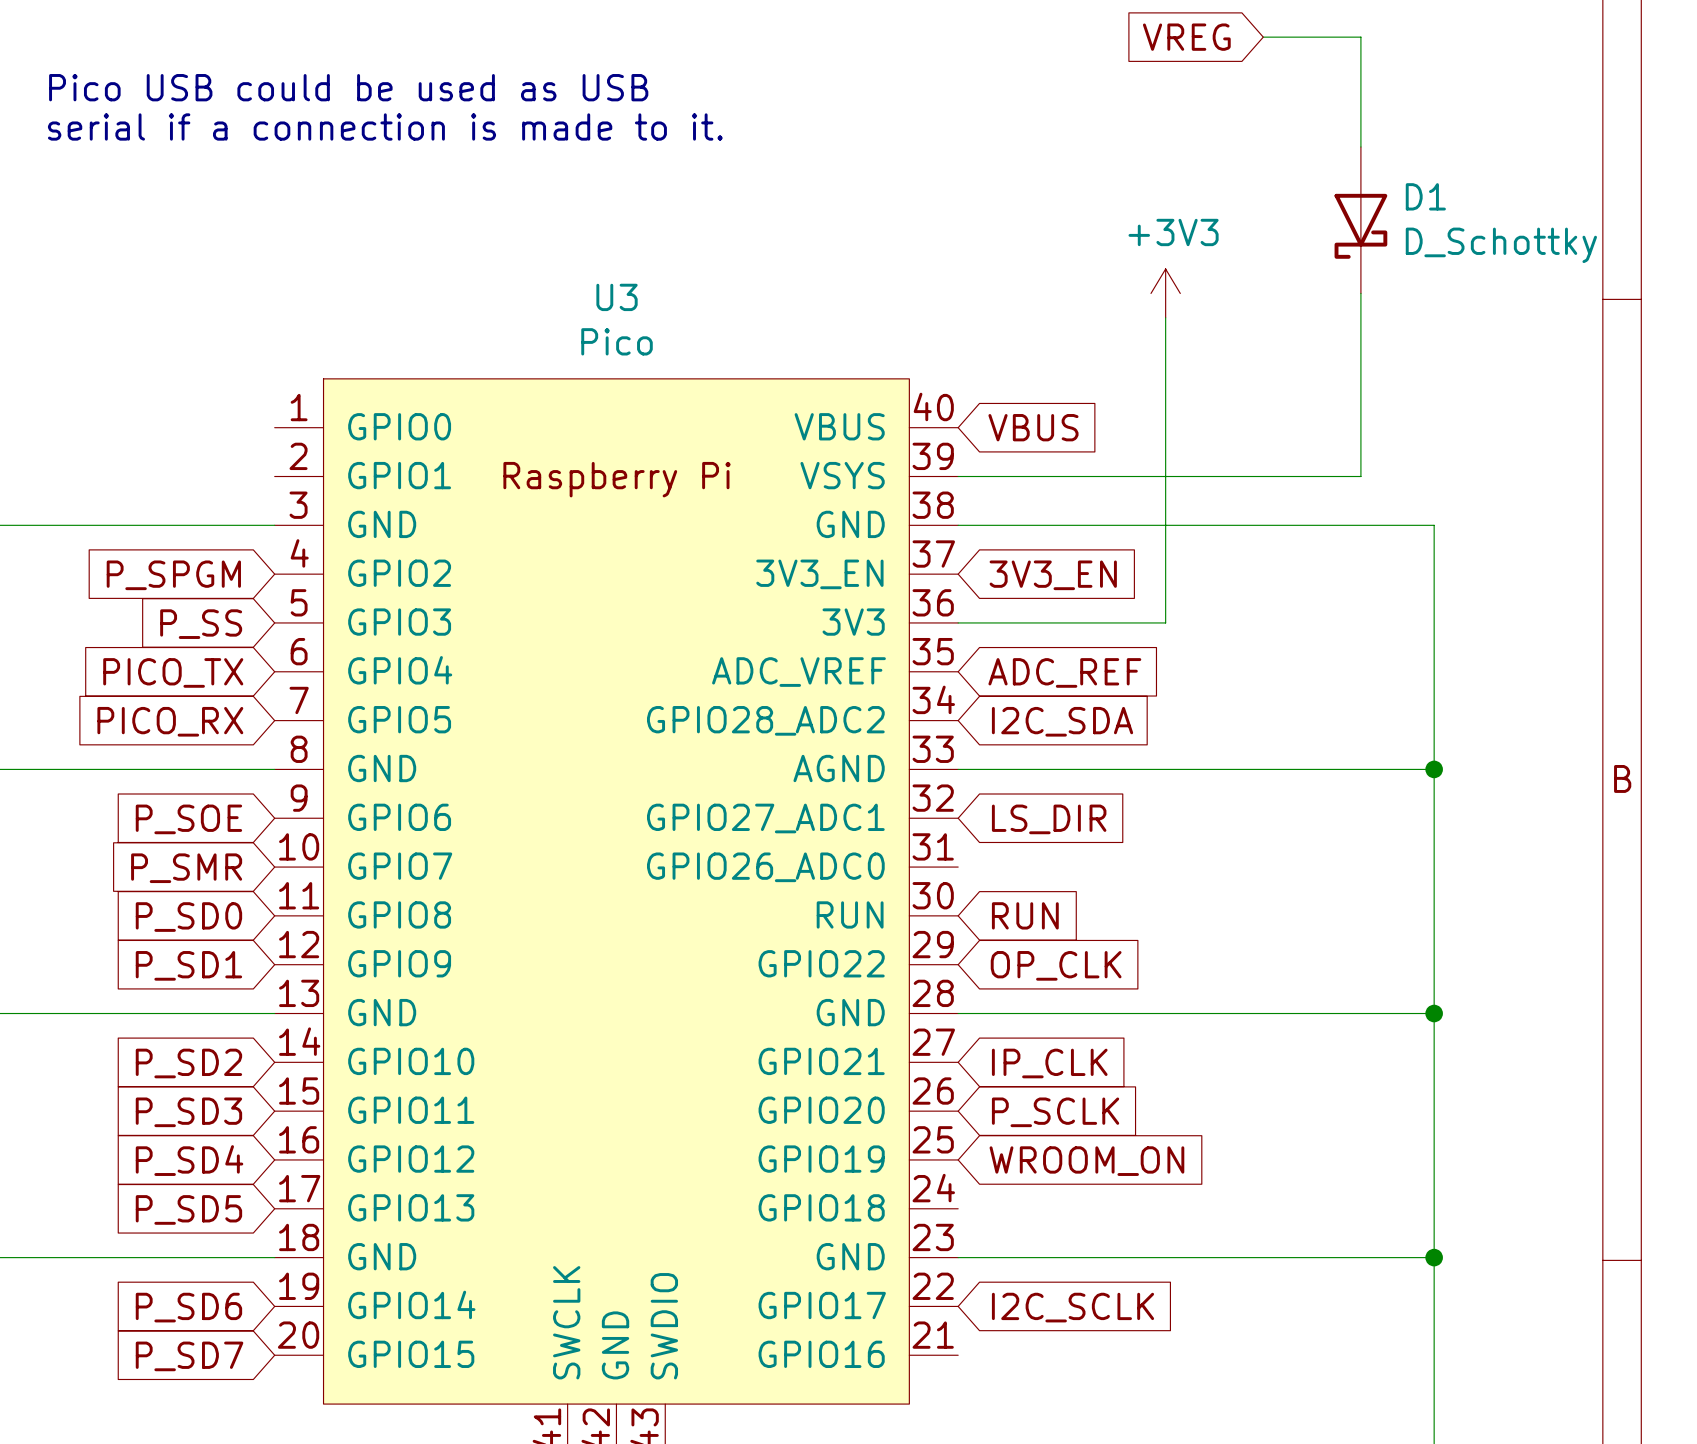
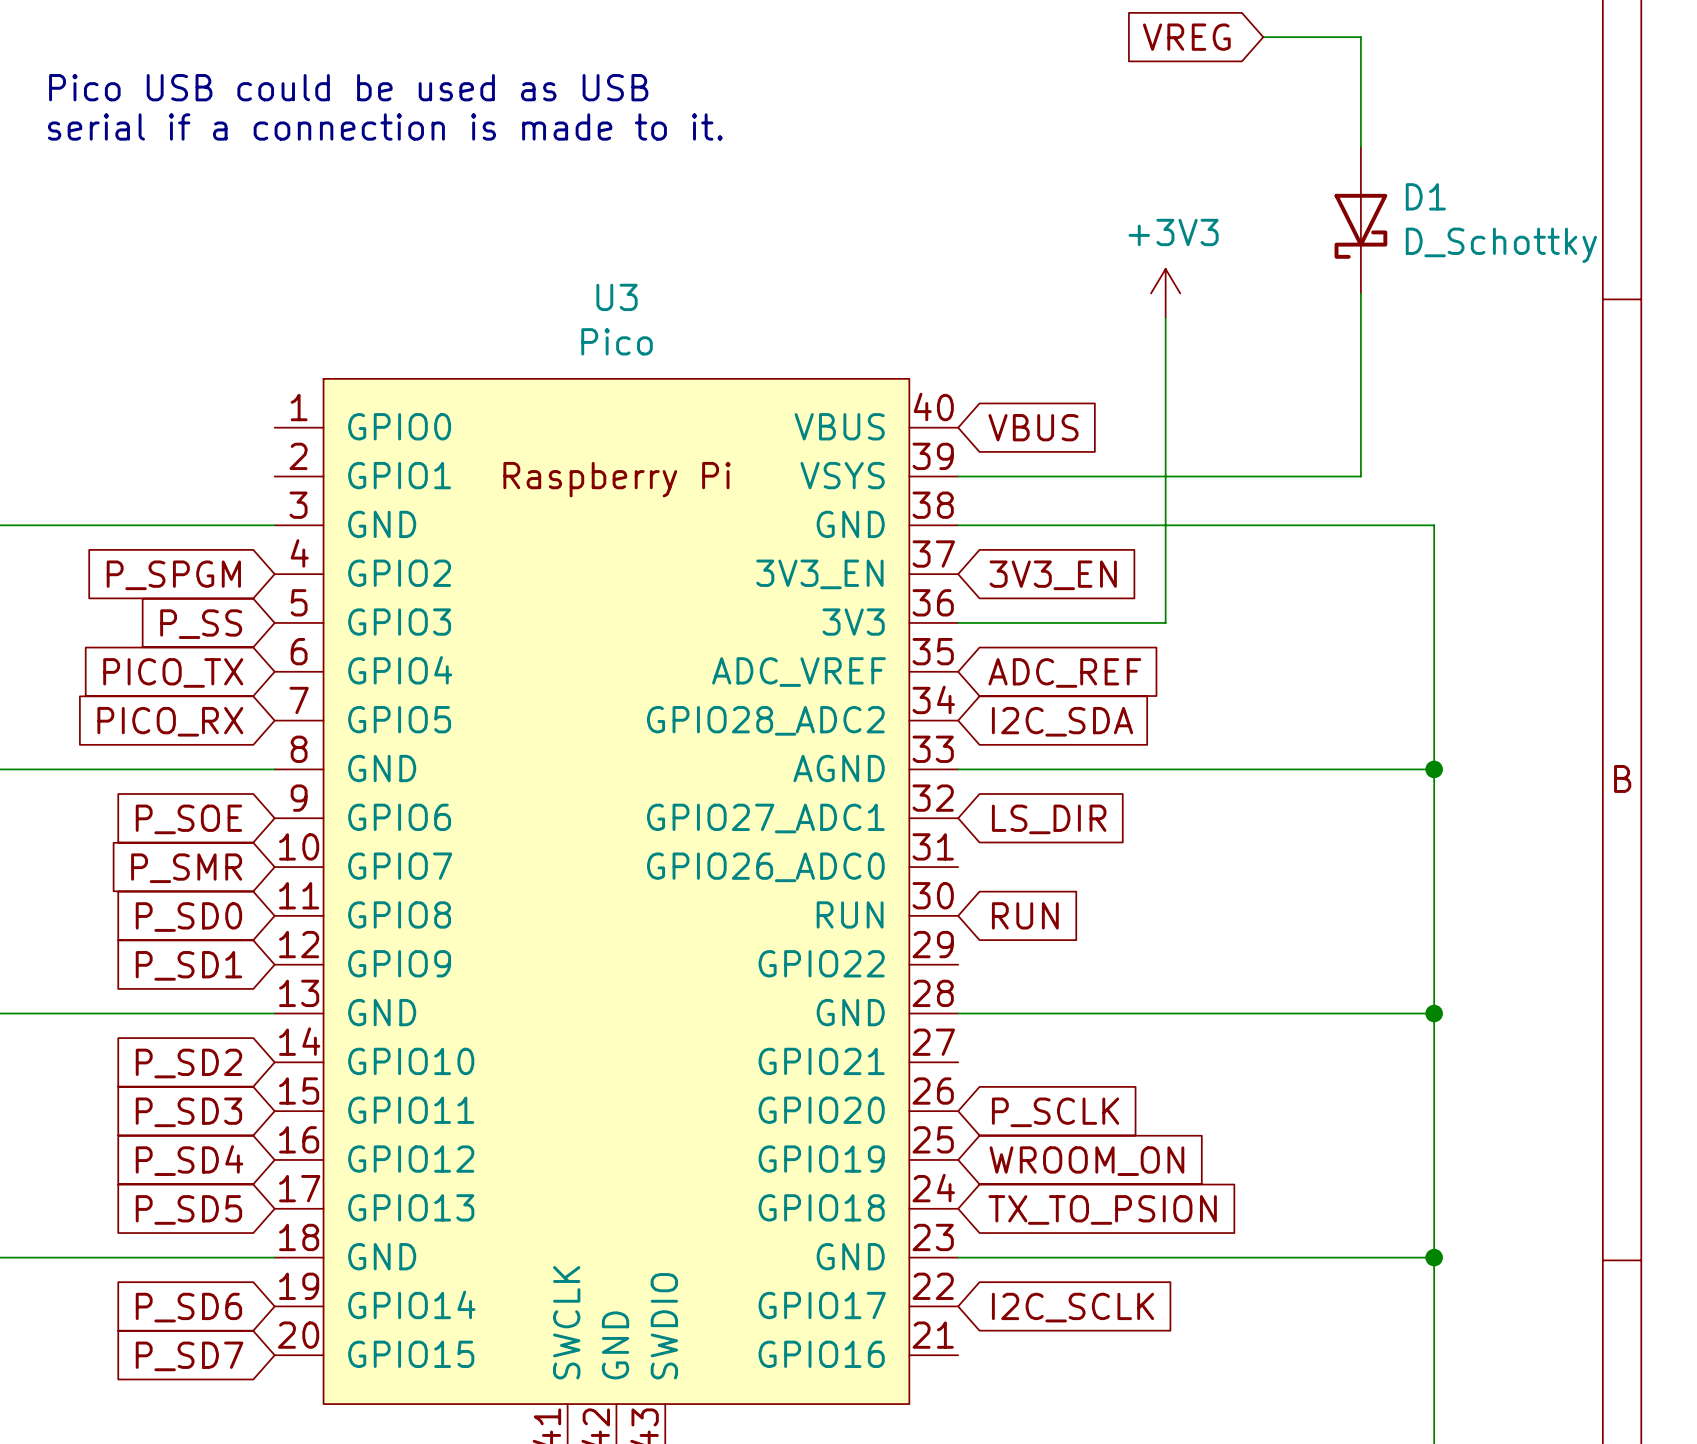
global label: OP_CLK (1056, 965) -> none
global label: IP_CLK (1049, 1063) -> none
global label: none -> TX_TO_PSION (1102, 1209)

